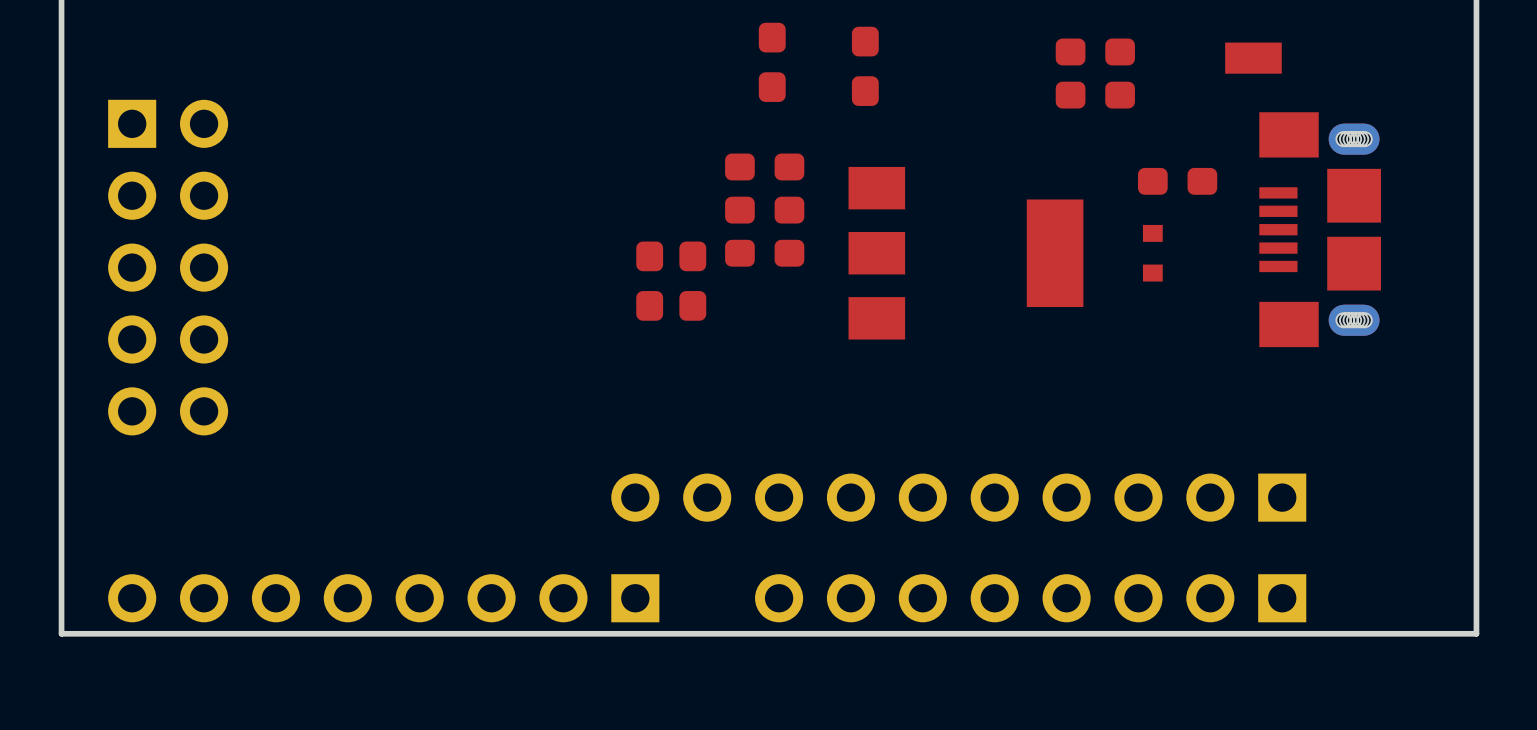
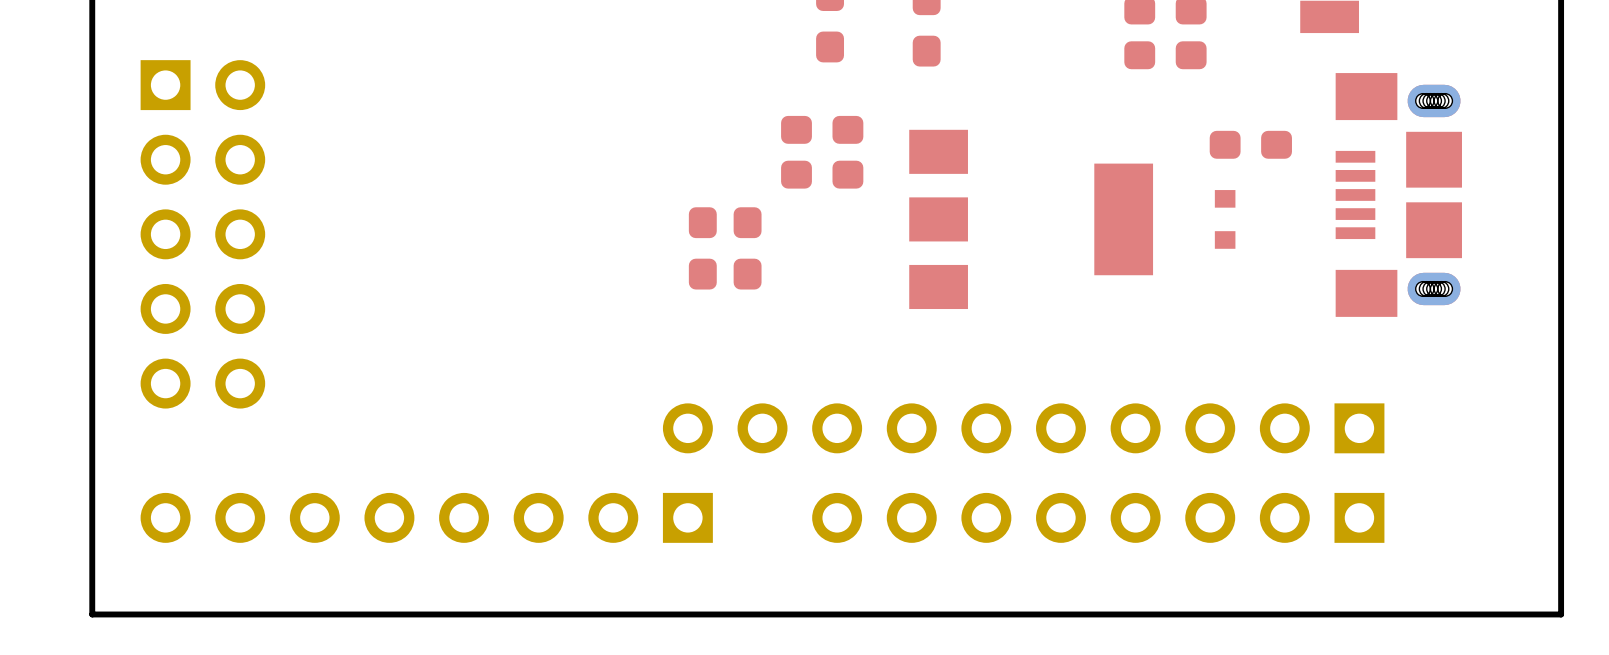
part: (764, 253) -> none
part position: (958, 497) -> (1023, 428)
part position: (383, 598) -> (426, 517)
part position: (1030, 598) -> (1098, 517)

